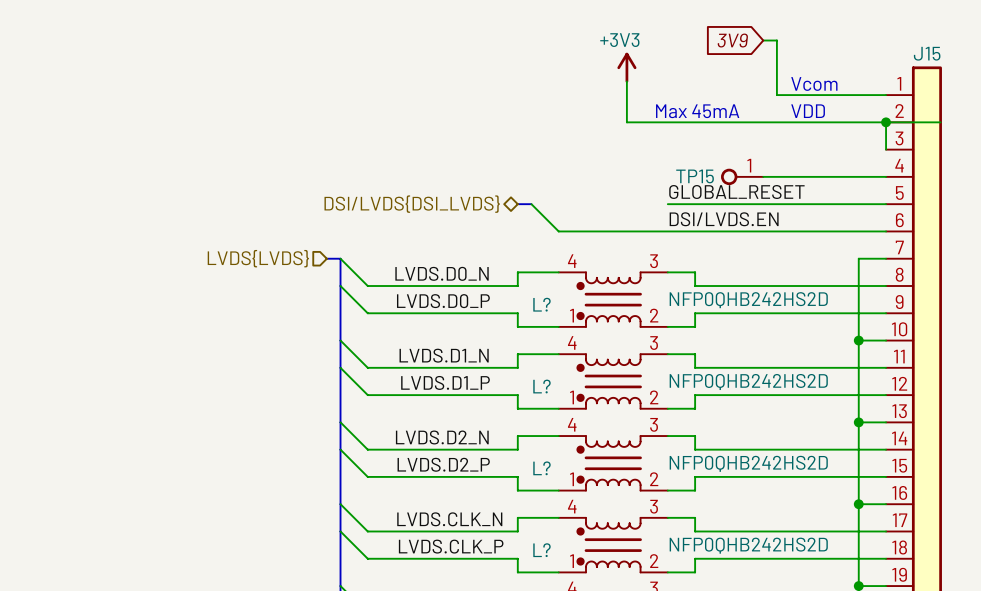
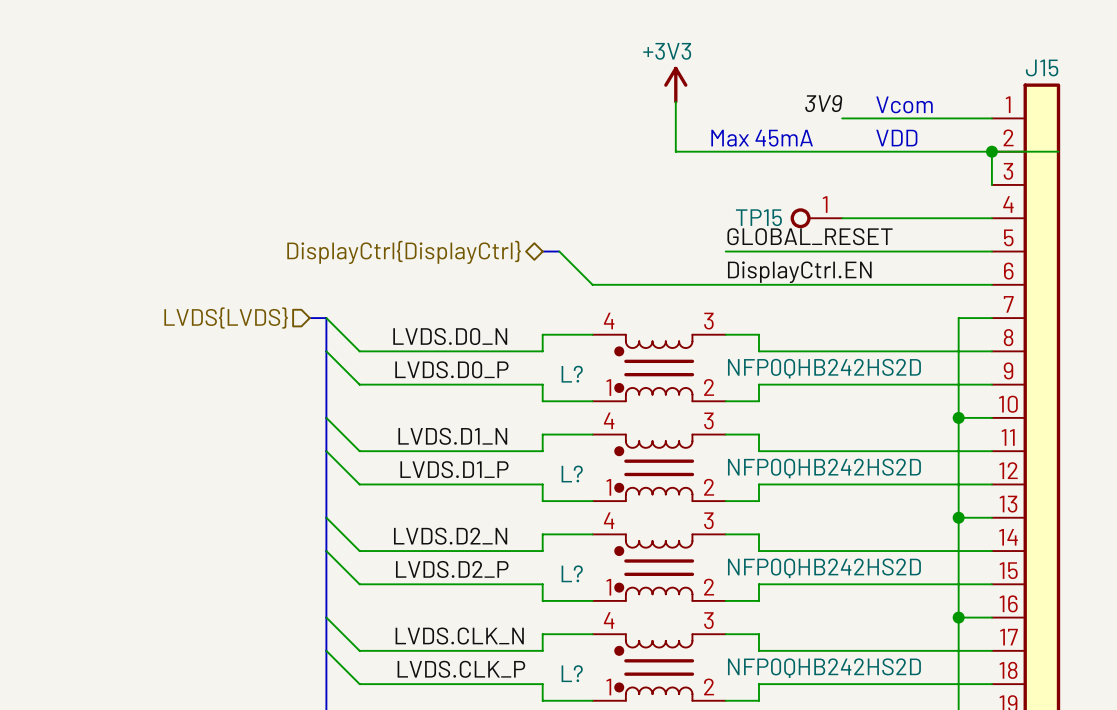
global label: 3V9 (732, 40) -> none
wire: (763, 40) (776, 40) (776, 95) -> (842, 118) (858, 118)
label: none -> 3V9 (823, 103)
hierarchical label: DSI/LVDS{DSI_LVDS} (412, 204) -> DisplayCtrl{DisplayCtrl} (404, 252)
label: DSI/LVDS.EN (724, 219) -> DisplayCtrl.EN (799, 272)

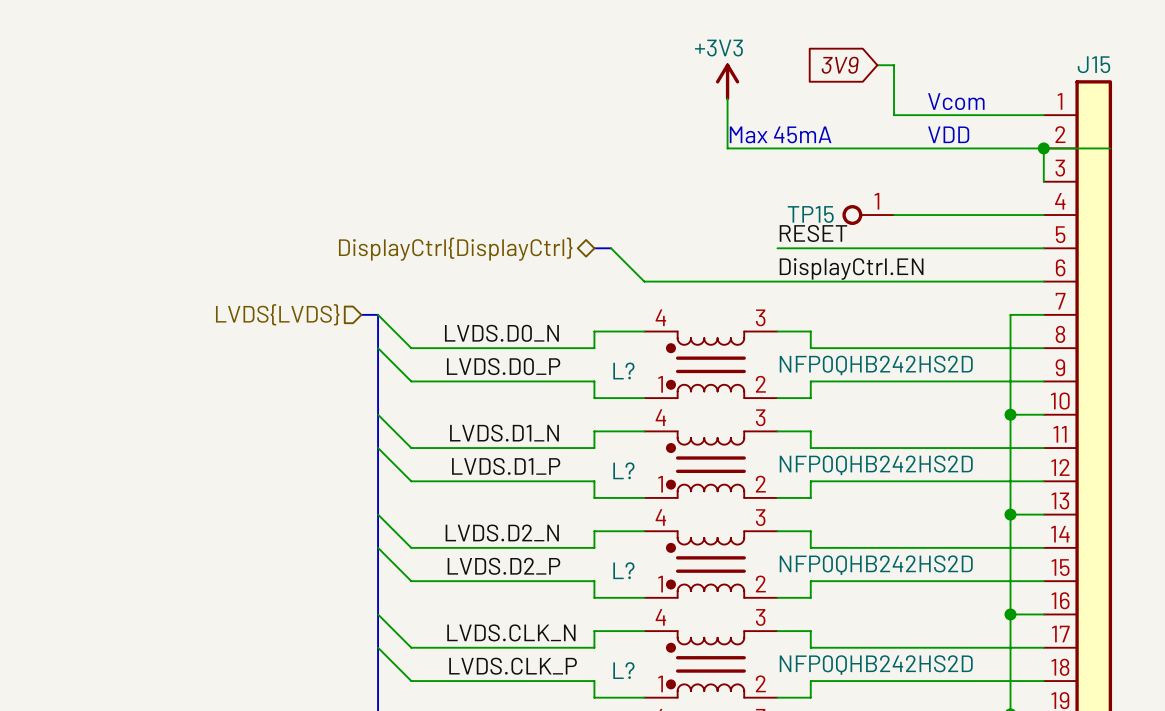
global label: none -> 3V9 (840, 65)
wire: none -> (877, 65) (894, 65) (894, 115)
label: 3V9 (823, 103) -> none
text position: Max 45mA (762, 138) -> Max 45mA (780, 134)
label: GLOBAL_RESET (810, 236) -> RESET (813, 233)

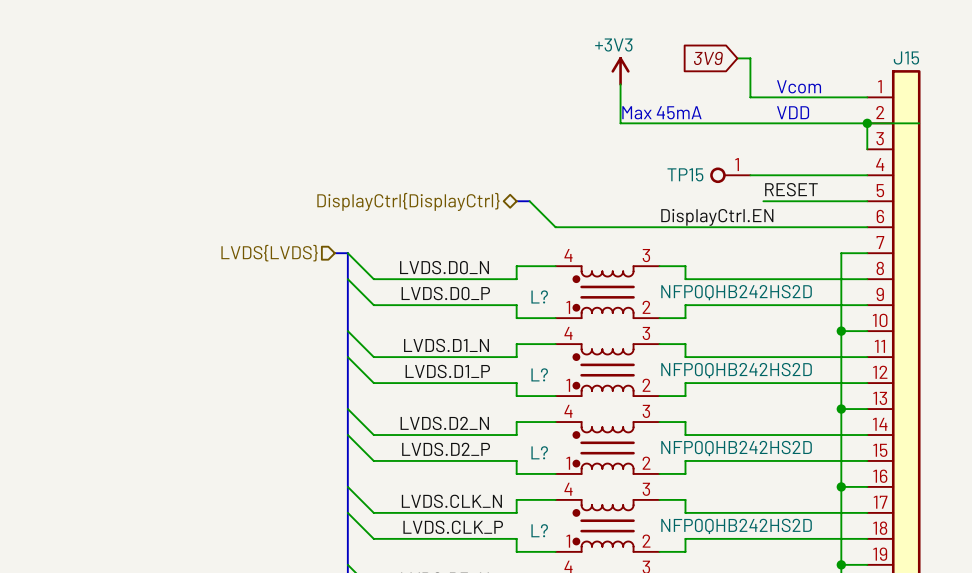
label position: RESET (813, 233) -> RESET (791, 189)
wire: (777, 248) (910, 248) -> none

